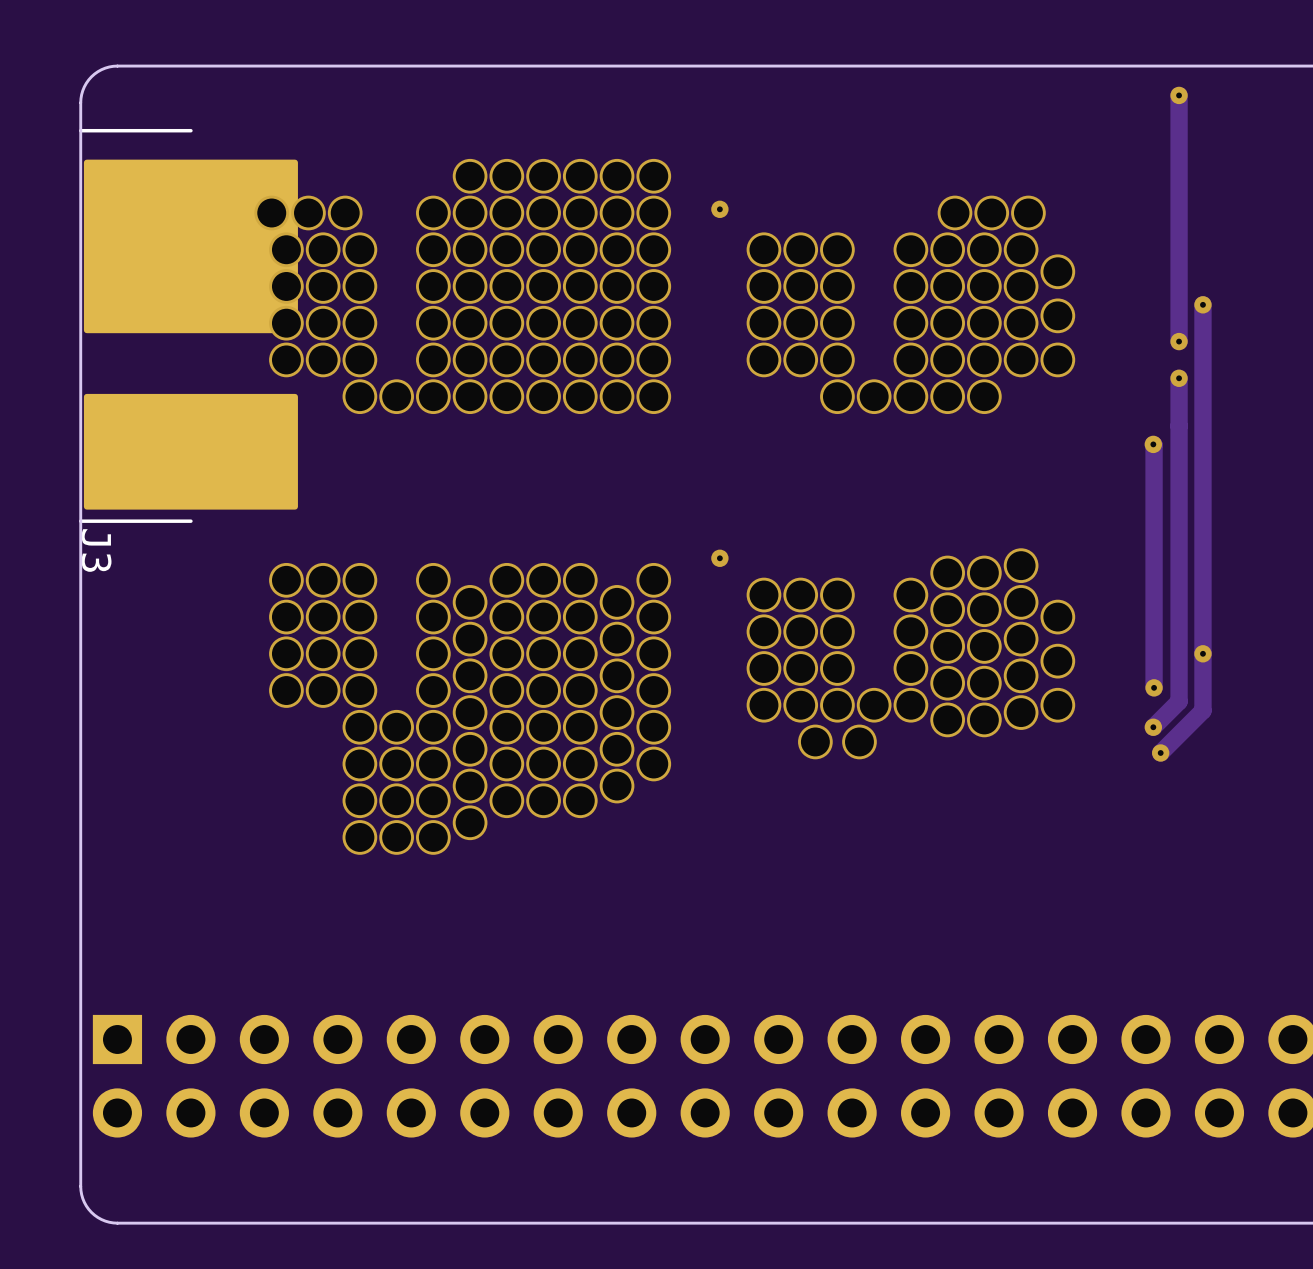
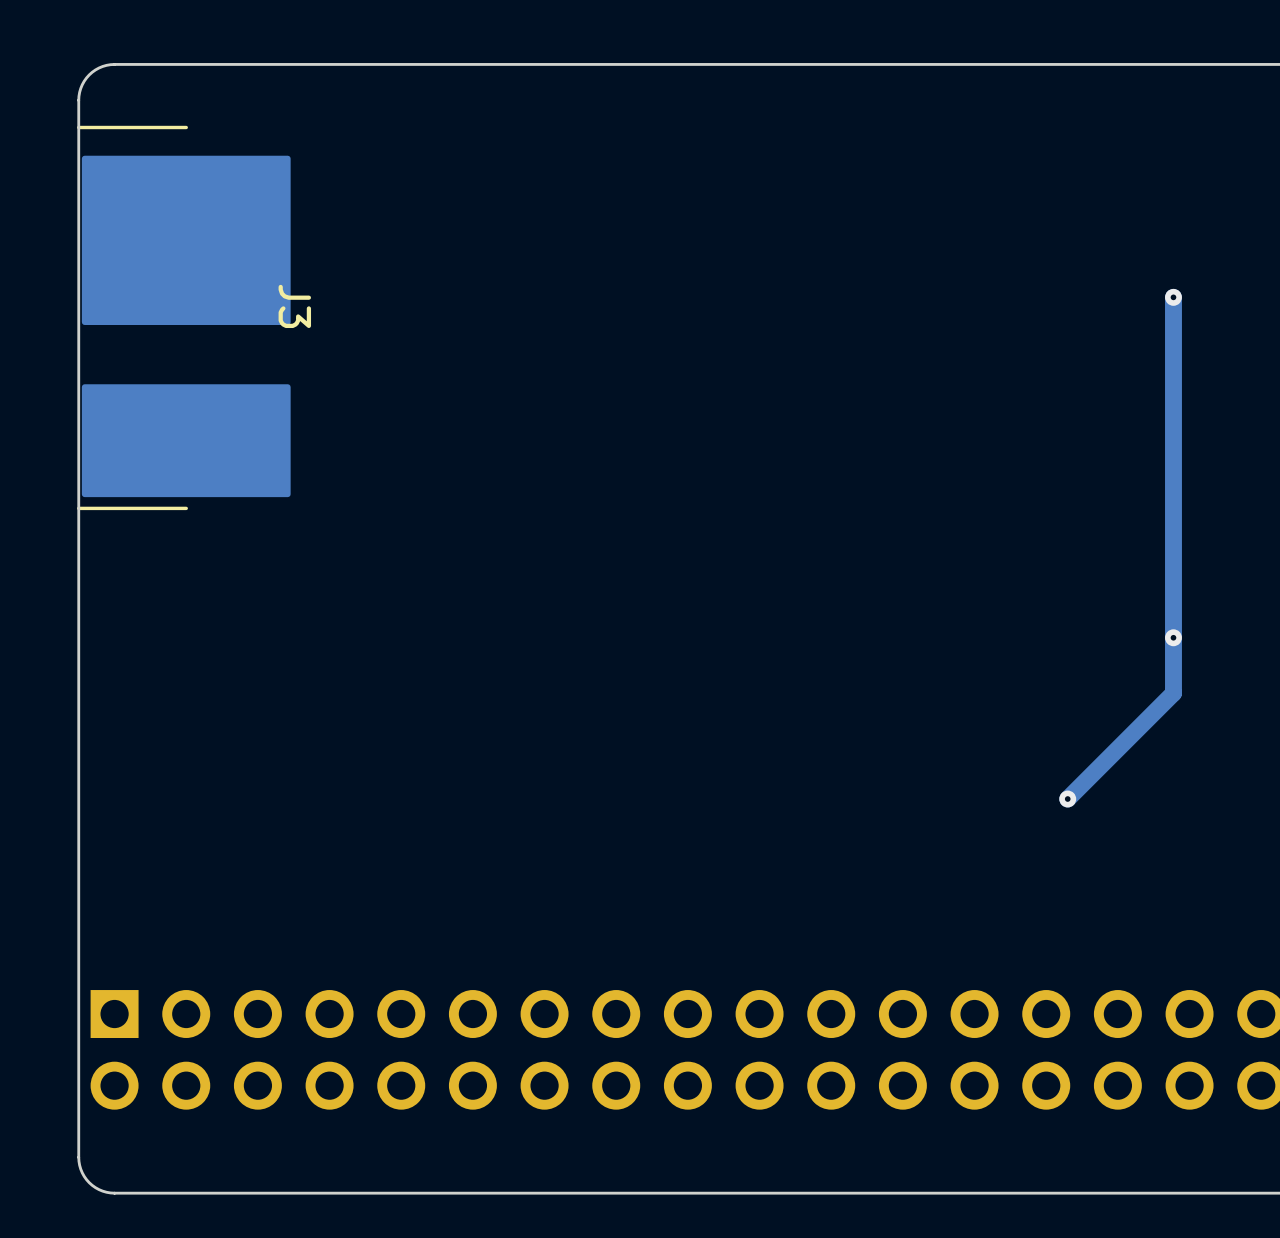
track: (1179, 95) (1179, 341) -> none
via: (1179, 95) -> none
via: (470, 176) -> none
via: (506, 176) -> none
via: (543, 176) -> none
via: (580, 176) -> none
via: (617, 176) -> none
via: (653, 176) -> none
via: (719, 209) -> none
via: (271, 212) -> none
via: (308, 212) -> none
via: (345, 212) -> none
via: (433, 212) -> none
via: (470, 212) -> none
via: (506, 212) -> none
via: (543, 212) -> none
via: (580, 212) -> none
via: (617, 212) -> none
via: (653, 212) -> none
via: (954, 212) -> none
via: (991, 212) -> none
via: (1028, 212) -> none
via: (286, 249) -> none
via: (323, 249) -> none
via: (359, 249) -> none
via: (433, 249) -> none
via: (470, 249) -> none
via: (506, 249) -> none
via: (543, 249) -> none
via: (580, 249) -> none
via: (617, 249) -> none
via: (653, 249) -> none
via: (763, 249) -> none
via: (800, 249) -> none
via: (837, 249) -> none
via: (910, 249) -> none
via: (947, 249) -> none
via: (984, 249) -> none
via: (1021, 249) -> none
via: (1057, 271) -> none
via: (286, 286) -> none
via: (323, 286) -> none
via: (359, 286) -> none
via: (433, 286) -> none
via: (470, 286) -> none
via: (506, 286) -> none
via: (543, 286) -> none
via: (580, 286) -> none
via: (617, 286) -> none
via: (653, 286) -> none
via: (763, 286) -> none
via: (800, 286) -> none
via: (837, 286) -> none
via: (910, 286) -> none
via: (947, 286) -> none
via: (984, 286) -> none
via: (1021, 286) -> none
via: (1057, 315) -> none
via: (286, 323) -> none
via: (323, 323) -> none
via: (359, 323) -> none
via: (433, 323) -> none
via: (470, 323) -> none
via: (506, 323) -> none
via: (543, 323) -> none
via: (580, 323) -> none
via: (617, 323) -> none
via: (653, 323) -> none
via: (763, 323) -> none
via: (800, 323) -> none
via: (837, 323) -> none
via: (910, 323) -> none
via: (947, 323) -> none
via: (984, 323) -> none
via: (1021, 323) -> none
via: (1179, 341) -> none
via: (286, 359) -> none
via: (323, 359) -> none
via: (359, 359) -> none
via: (433, 359) -> none
via: (470, 359) -> none
via: (506, 359) -> none
via: (543, 359) -> none
via: (580, 359) -> none
via: (617, 359) -> none
via: (653, 359) -> none
via: (763, 359) -> none
via: (800, 359) -> none
via: (837, 359) -> none
via: (910, 359) -> none
via: (947, 359) -> none
via: (984, 359) -> none
via: (1021, 359) -> none
via: (1057, 359) -> none
track: (1179, 378) (1179, 701) (1153, 727) -> none
via: (1179, 378) -> none
via: (359, 396) -> none
via: (396, 396) -> none
via: (433, 396) -> none
via: (470, 396) -> none
via: (506, 396) -> none
via: (543, 396) -> none
via: (580, 396) -> none
via: (617, 396) -> none
via: (653, 396) -> none
via: (837, 396) -> none
via: (874, 396) -> none
via: (910, 396) -> none
via: (947, 396) -> none
via: (984, 396) -> none
track: (1153, 444) (1154, 687) -> none
via: (1153, 444) -> none
J3 name position: J3 (96, 550) -> J3 (294, 306)
via: (719, 558) -> none
via: (1021, 565) -> none
via: (947, 572) -> none
via: (984, 572) -> none
via: (286, 580) -> none
via: (323, 580) -> none
via: (359, 580) -> none
via: (433, 580) -> none
via: (506, 580) -> none
via: (543, 580) -> none
via: (580, 580) -> none
via: (653, 580) -> none
via: (763, 595) -> none
via: (800, 595) -> none
via: (837, 595) -> none
via: (910, 595) -> none
via: (470, 602) -> none
via: (617, 602) -> none
via: (1021, 602) -> none
via: (947, 609) -> none
via: (984, 609) -> none
via: (286, 617) -> none
via: (323, 617) -> none
via: (359, 617) -> none
via: (433, 617) -> none
via: (506, 617) -> none
via: (543, 617) -> none
via: (580, 617) -> none
via: (653, 617) -> none
via: (1057, 617) -> none
via: (763, 631) -> none
via: (800, 631) -> none
via: (837, 631) -> none
via: (910, 631) -> none
via: (470, 639) -> none
via: (617, 639) -> none
via: (1021, 639) -> none
via: (947, 646) -> none
via: (984, 646) -> none
via: (286, 653) -> none
via: (323, 653) -> none
via: (359, 653) -> none
via: (433, 653) -> none
via: (506, 653) -> none
via: (543, 653) -> none
via: (580, 653) -> none
via: (653, 653) -> none
via: (1057, 661) -> none
via: (763, 668) -> none
via: (800, 668) -> none
via: (837, 668) -> none
via: (910, 668) -> none
via: (470, 675) -> none
via: (617, 675) -> none
via: (1021, 675) -> none
via: (947, 683) -> none
via: (984, 683) -> none
via: (1154, 687) -> none
via: (286, 690) -> none
via: (323, 690) -> none
via: (359, 690) -> none
via: (433, 690) -> none
via: (506, 690) -> none
via: (543, 690) -> none
via: (580, 690) -> none
via: (653, 690) -> none
via: (763, 705) -> none
via: (800, 705) -> none
via: (837, 705) -> none
via: (874, 705) -> none
via: (910, 705) -> none
via: (1057, 705) -> none
via: (470, 712) -> none
via: (617, 712) -> none
via: (1021, 712) -> none
via: (947, 719) -> none
via: (984, 719) -> none
via: (359, 727) -> none
via: (396, 727) -> none
via: (433, 727) -> none
via: (506, 727) -> none
via: (543, 727) -> none
via: (580, 727) -> none
via: (653, 727) -> none
via: (1153, 727) -> none
via: (815, 741) -> none
via: (859, 741) -> none
via: (470, 749) -> none
via: (617, 749) -> none
track: none -> (1132, 734) (1067, 799)
via: (1160, 752) -> none
via: (359, 764) -> none
via: (396, 764) -> none
via: (433, 764) -> none
via: (506, 764) -> none
via: (543, 764) -> none
via: (580, 764) -> none
via: (653, 764) -> none
via: (470, 786) -> none
via: (617, 786) -> none
via: (359, 800) -> none
via: (396, 800) -> none
via: (433, 800) -> none
via: (506, 800) -> none
via: (543, 800) -> none
via: (580, 800) -> none
via: none -> (1067, 799)
via: (470, 822) -> none
via: (359, 837) -> none
via: (396, 837) -> none
via: (433, 837) -> none

